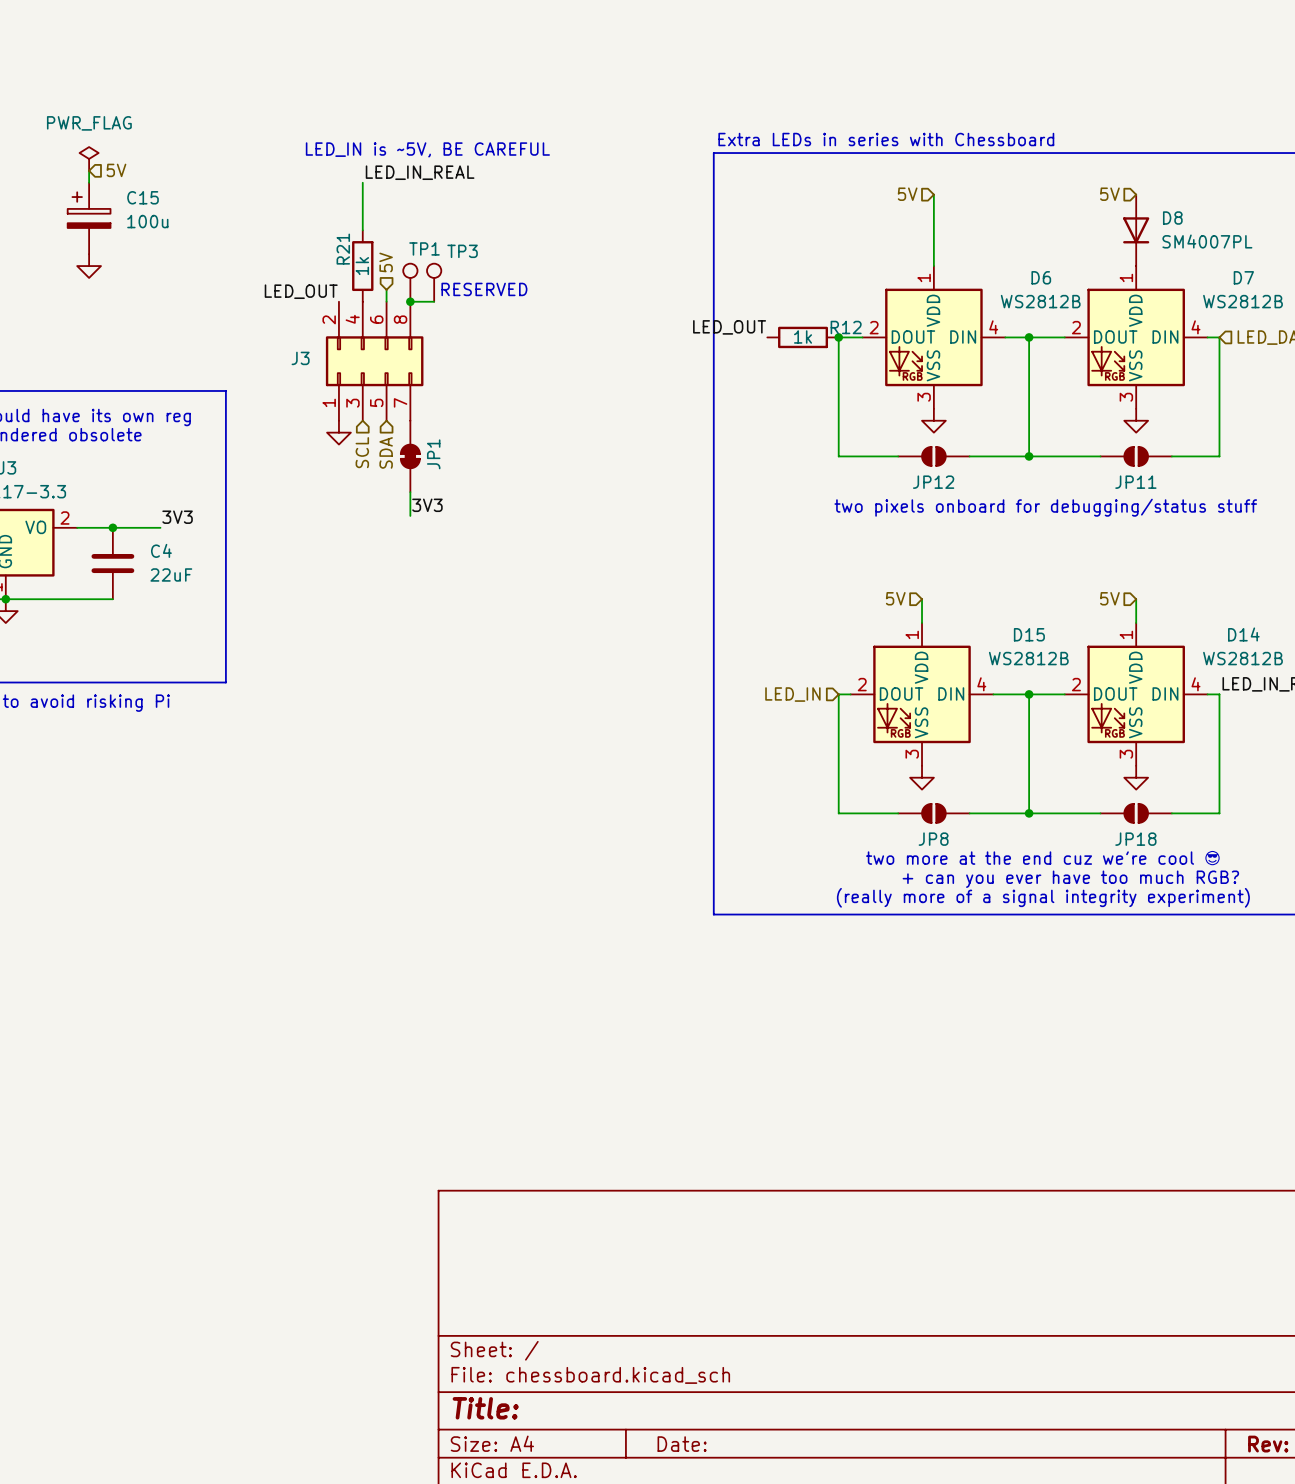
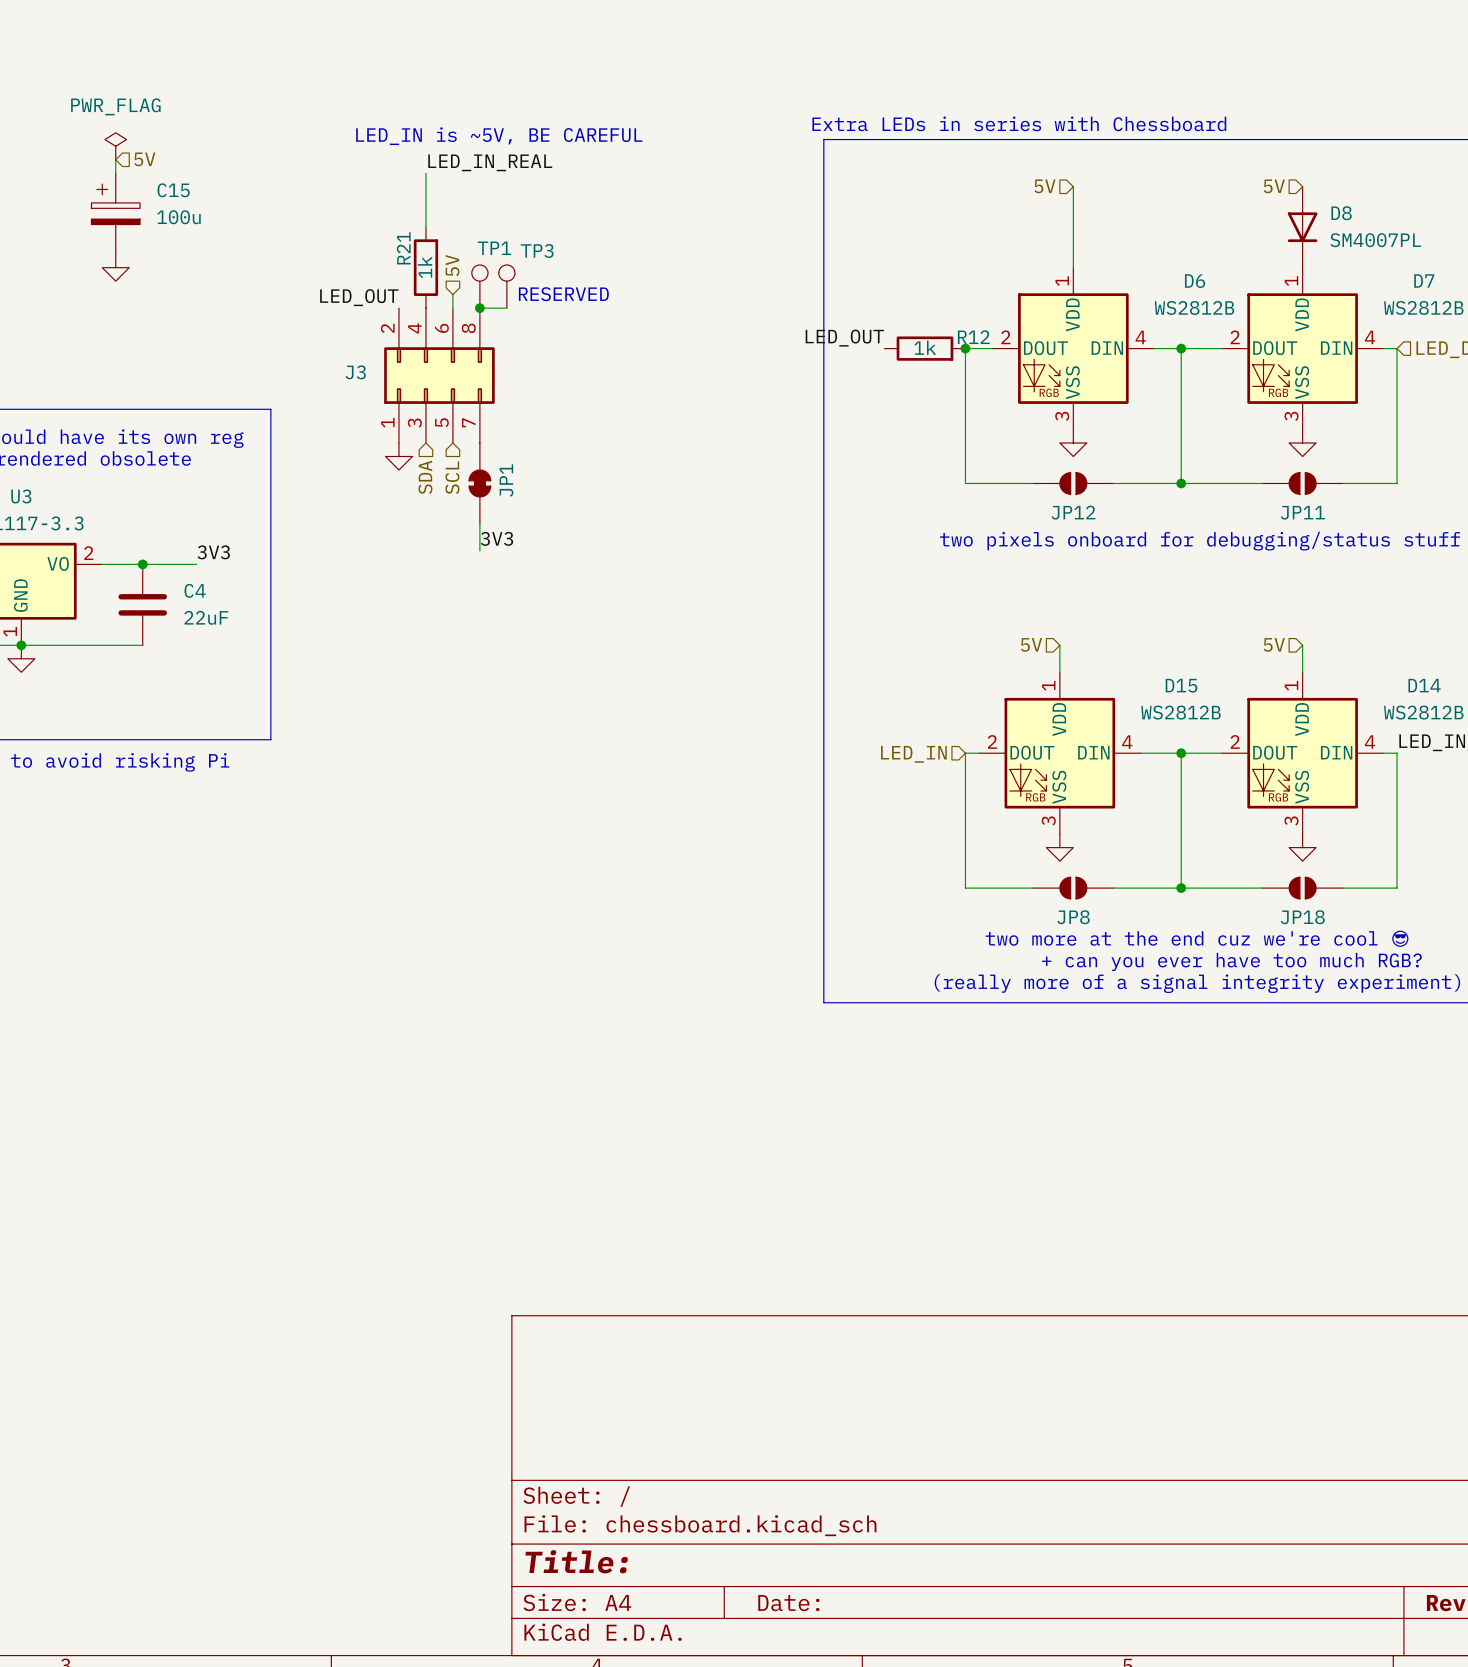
hierarchical label: SCL (362, 452) -> SDA (425, 477)
hierarchical label: SDA (386, 452) -> SCL (452, 477)

